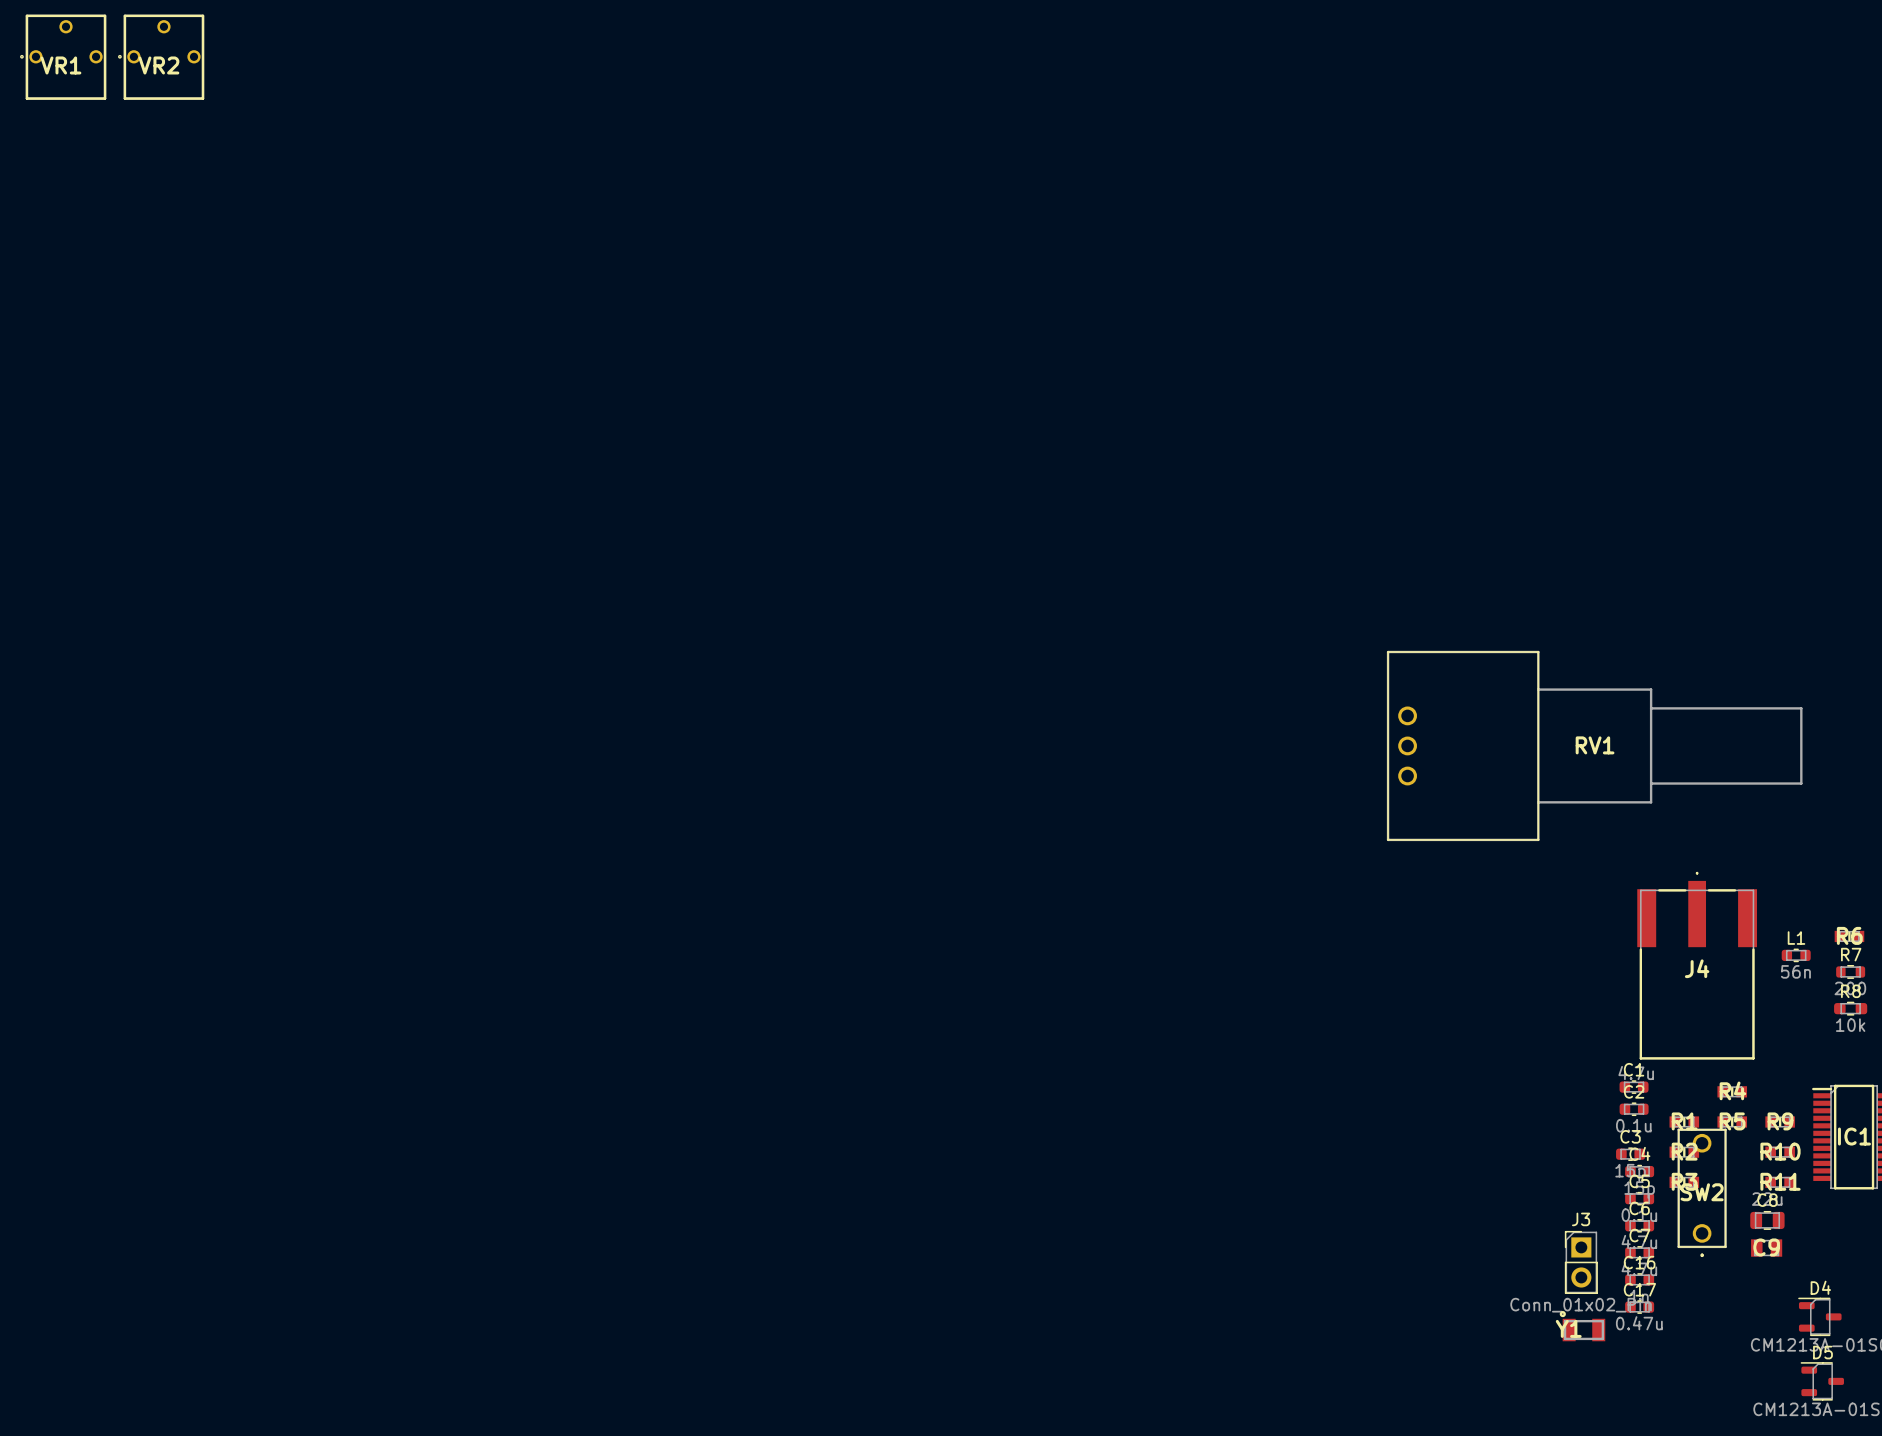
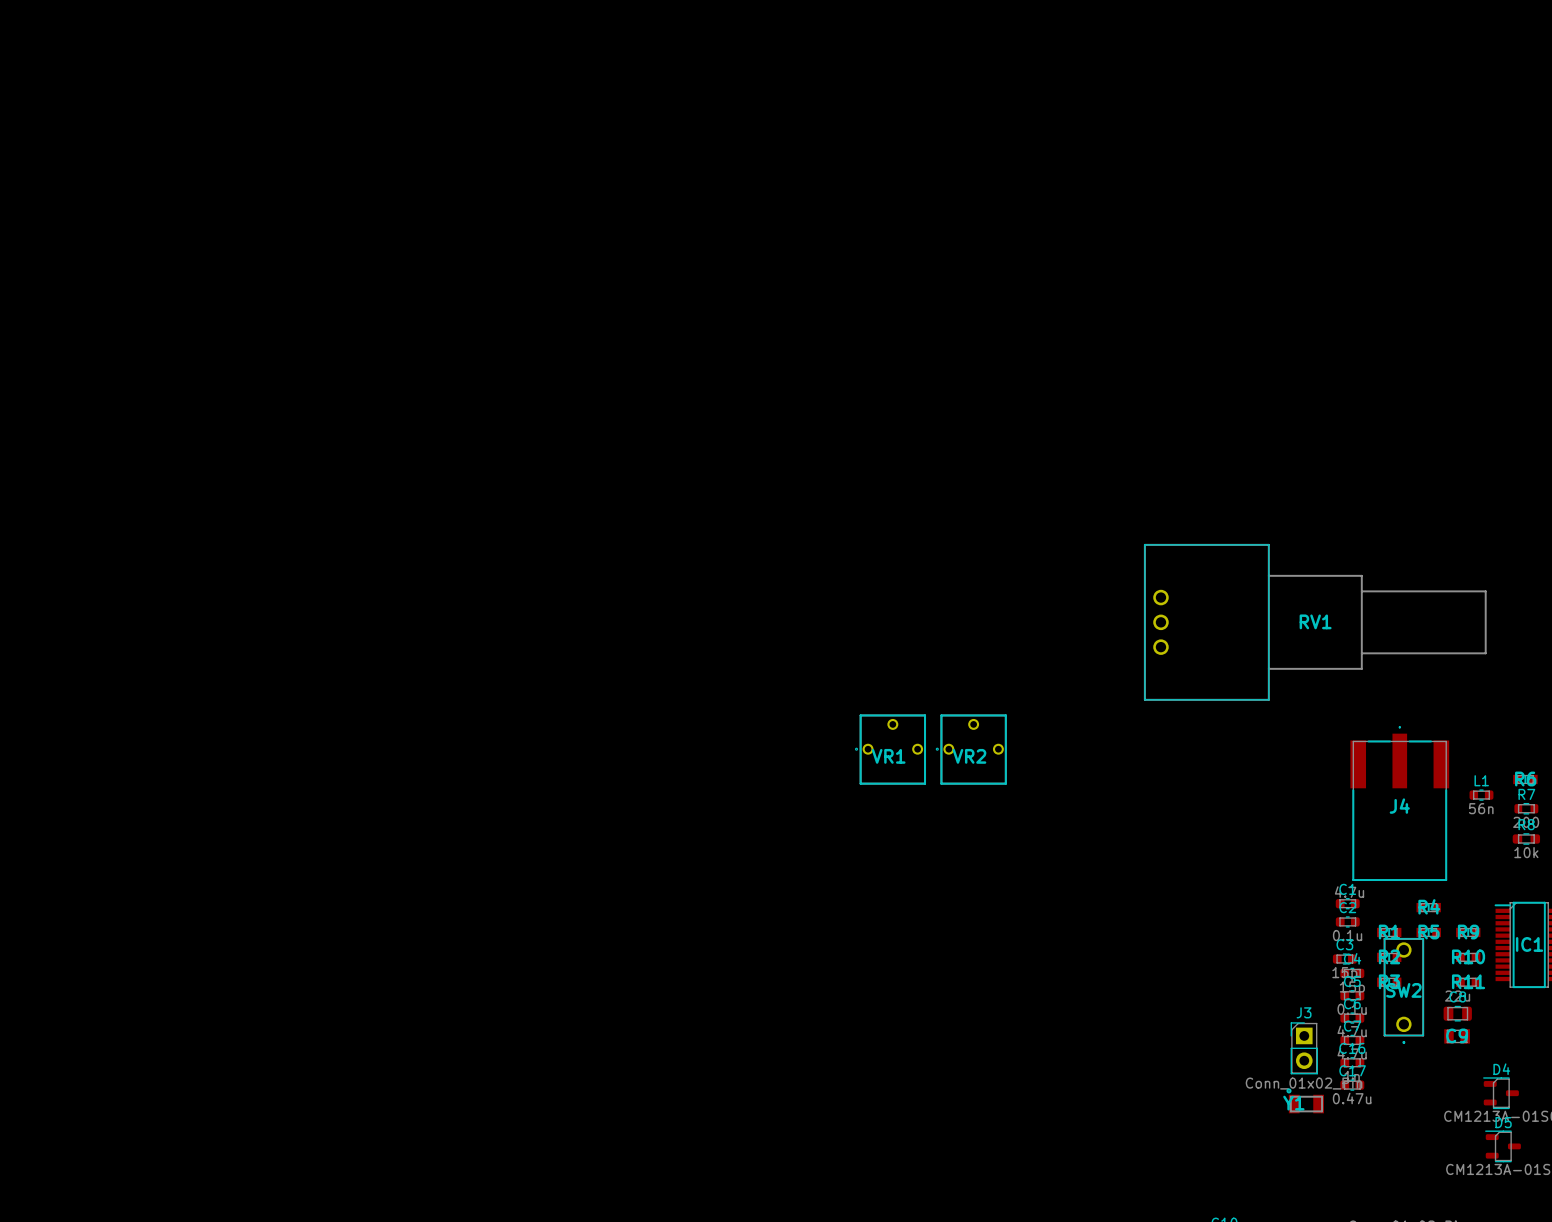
VR1 position: (63, 57) -> (890, 749)
VR2 position: (161, 57) -> (971, 749)

